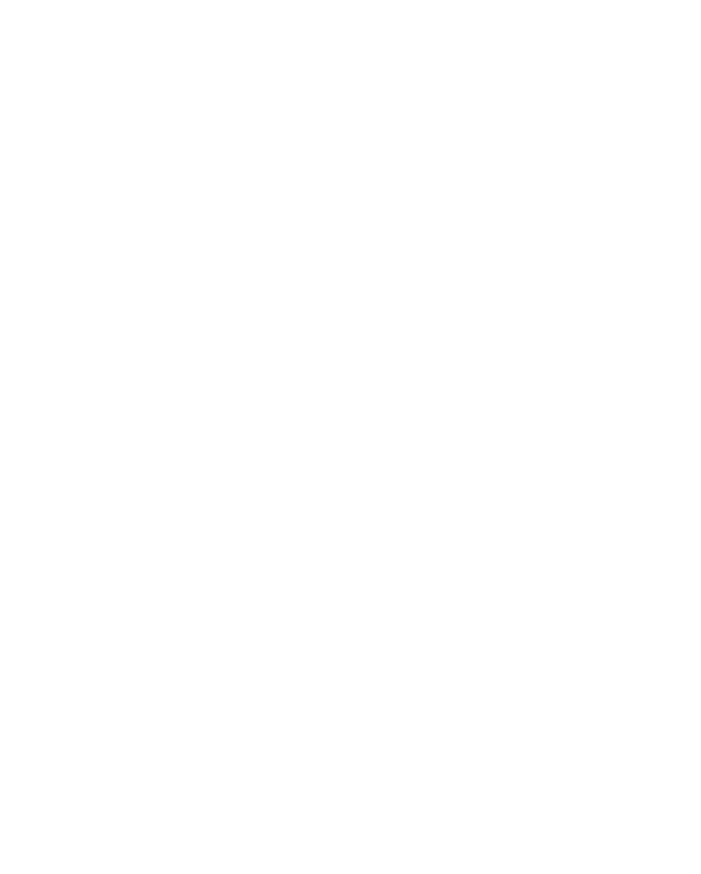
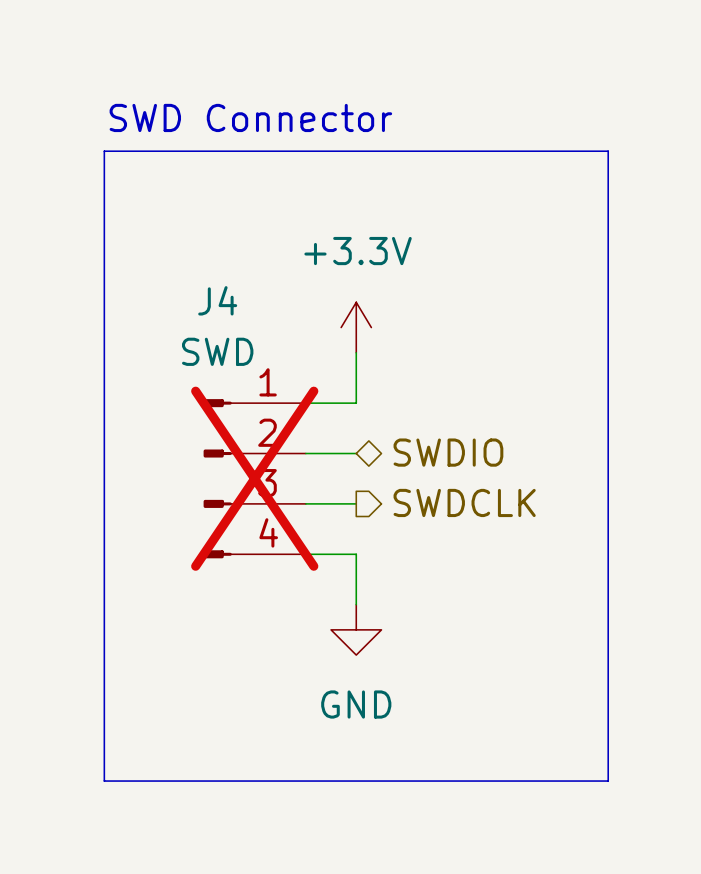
text: none -> SWD Connector (250, 117)
line: none -> (104, 151) (608, 151) (608, 781) (104, 781) (104, 151)
power symbol: none -> +3.3V (356, 327)
wire: none -> (356, 352) (356, 403) (305, 403)
hierarchical label: none -> SWDIO (448, 452)
wire: none -> (305, 453) (356, 453)
J4: none -> SWD (254, 478)
hierarchical label: none -> SWDCLK (464, 502)
wire: none -> (305, 503) (356, 503)
wire: none -> (305, 554) (356, 554) (356, 604)
power symbol: none -> GND (356, 629)

